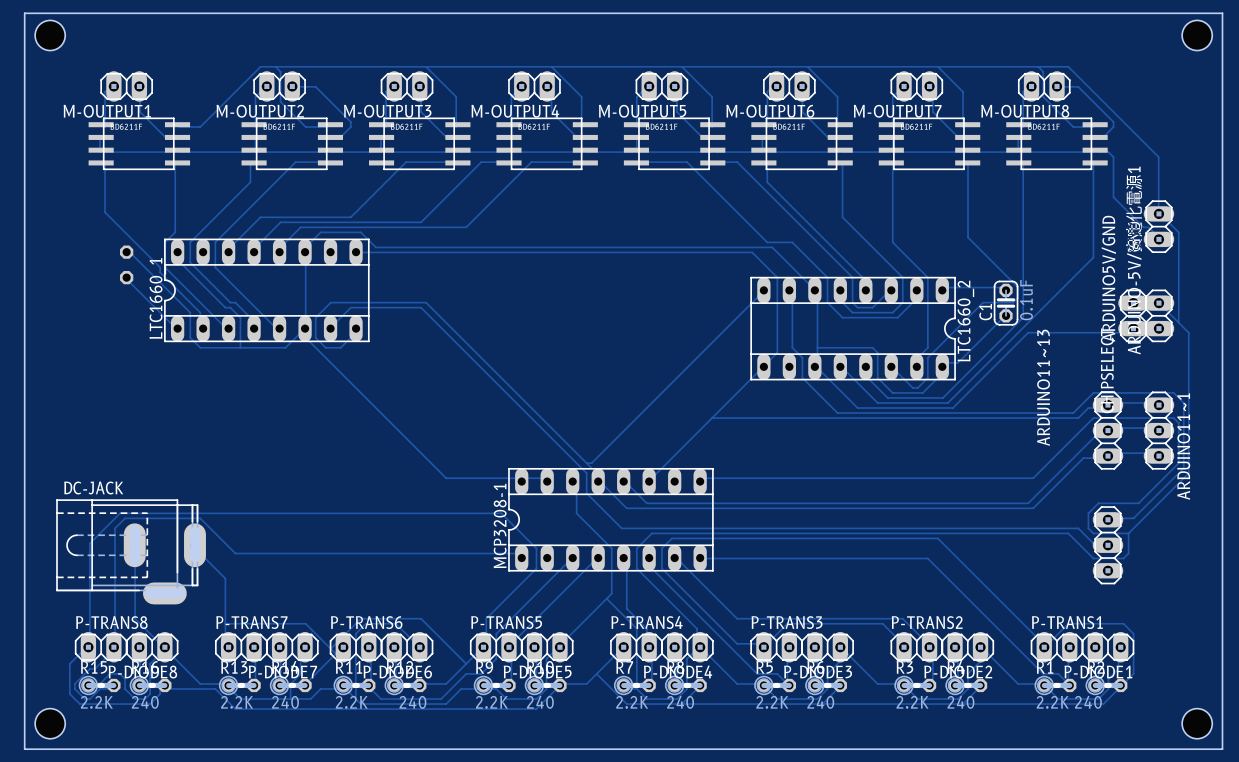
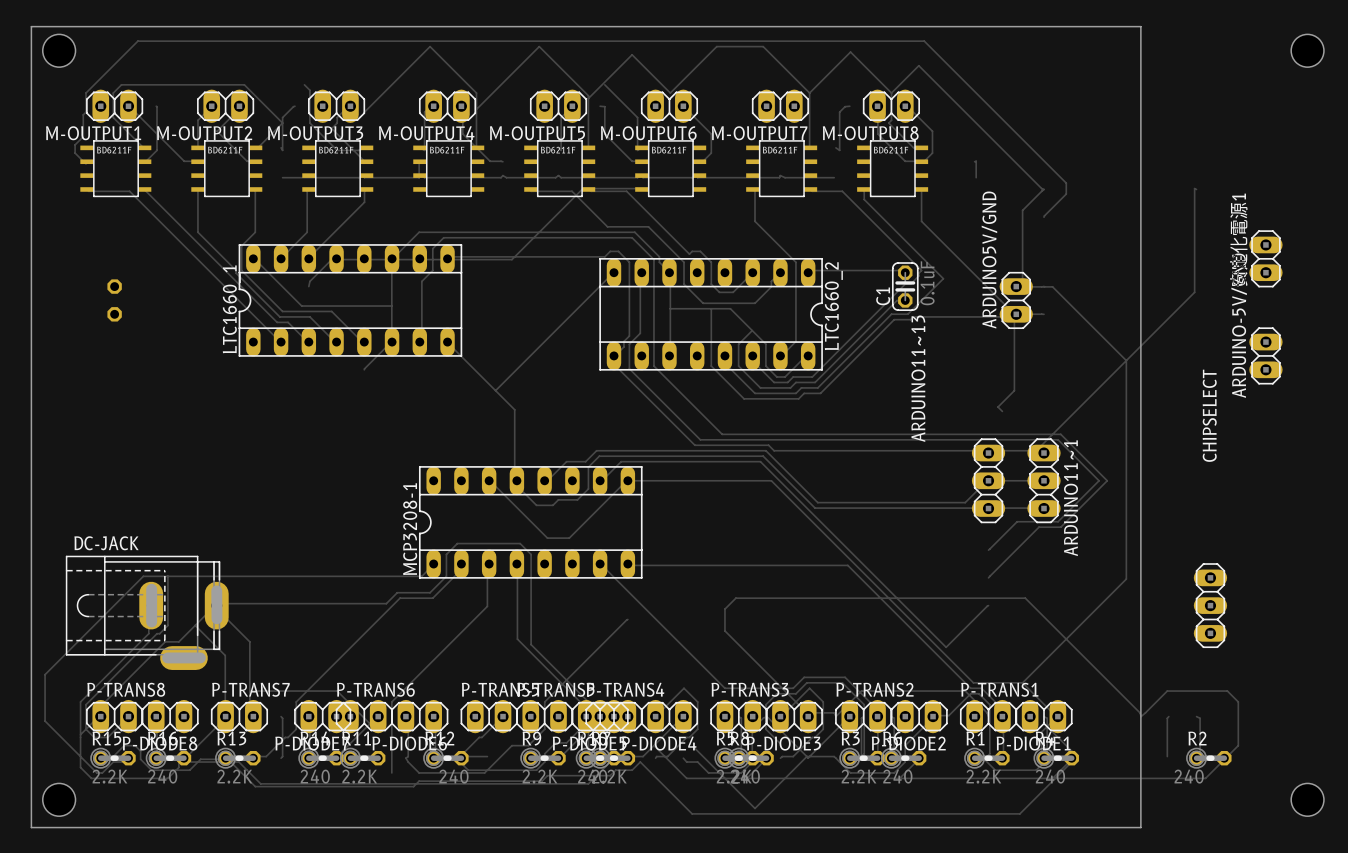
board edge: (1044, 13) (1222, 13) (1222, 749) (1044, 749) -> (1140, 26) (1140, 827)
track: none -> (468, 84) (430, 46) (364, 112)
track: (681, 66) (712, 96) (712, 127) (712, 124) -> none
track: none -> (883, 84) (850, 52) (809, 93)
track: (937, 66) (962, 91) (962, 127) (967, 124) -> none
track: (1038, 66) (1043, 71) (1043, 96) (1073, 127) (1093, 127) (1095, 124) -> none
track: (433, 74) (456, 96) (456, 127) (457, 124) -> (476, 93) (477, 147)
track: none -> (809, 93) (763, 46) (716, 46) (670, 93) (632, 54) (588, 98)
track: none -> (809, 93) (810, 147)
track: (814, 74) (837, 96) (837, 127) (840, 124) -> none
track: (113, 86) (109, 86) (104, 91) (104, 127) (101, 124) -> (128, 106) (157, 133) (157, 150) (144, 161)
M-OUTPUT1 position: (126, 86) -> (114, 106)
track: none -> (239, 106) (241, 106) (217, 131) (247, 161) (255, 161)
M-OUTPUT2 position: (279, 86) -> (225, 106)
track: (292, 86) (315, 86) (350, 121) (350, 127) (340, 137) (330, 137) -> none
M-OUTPUT3: none -> (336, 106)
track: none -> (350, 106) (337, 117) (337, 123) (331, 128) (366, 161)
M-OUTPUT4: (534, 86) -> none
track: none -> (683, 106) (711, 133) (711, 153) (703, 161) (699, 161)
track: (649, 86) (636, 96) (636, 127) (636, 124) -> none
M-OUTPUT5 position: (661, 86) -> (558, 106)
track: (674, 86) (676, 86) (676, 111) (702, 137) (712, 137) -> none
M-OUTPUT6 position: (789, 86) -> (669, 106)
track: none -> (905, 106) (932, 131) (932, 153) (921, 161)
track: (904, 86) (892, 96) (892, 127) (891, 124) -> none
M-OUTPUT7 position: (916, 86) -> (780, 106)
track: (929, 86) (932, 86) (932, 111) (957, 137) (967, 137) -> none
track: (1031, 86) (1023, 91) (1023, 127) (1018, 124) -> none
M-OUTPUT8 position: (1044, 86) -> (891, 106)
track: (1057, 86) (1078, 86) (1113, 121) (1113, 127) (1103, 137) (1095, 137) -> none
track: none -> (476, 109) (539, 46) (588, 95) (588, 147)
M-OUTPUT3 name: M-OUTPUT3 (387, 111) -> M-OUTPUT4 (426, 133)
track: none -> (144, 147) (113, 117) (113, 93) (121, 84) (244, 84) (282, 123) (255, 147)
track: (177, 124) (180, 127) (200, 127) (260, 66) (1068, 66) (1158, 157) (1158, 213) (1178, 232) (1178, 322) -> (197, 147) (197, 120) (211, 106)
track: none -> (921, 147) (913, 147) (888, 123) (891, 120) (891, 93) (918, 65) (1044, 189) (1022, 210) (1022, 278) (1016, 286) (1052, 286) (1126, 360) (1126, 579) (1022, 682)
track: (101, 137) (99, 152) (101, 150) (104, 152) (175, 152) (177, 150) (180, 152) (250, 152) (254, 150) (255, 152) (254, 137) -> none
track: (636, 137) (636, 152) -> none
track: (763, 137) (762, 137) (762, 152) (763, 150) (767, 152) (837, 152) (840, 150) (842, 152) (887, 152) (891, 150) (892, 152) (962, 152) (967, 150) (968, 152) (1018, 152) -> none
track: (1018, 137) (1018, 152) -> none
track: none -> (86, 164) (75, 153) (75, 144) (83, 136) (86, 93) (137, 41) (924, 41) (1066, 183) (1066, 194) (1044, 217)
part: none -> (115, 168)
part: (139, 143) -> none
part: none -> (226, 168)
part: (292, 143) -> none
part: none -> (337, 168)
part: none -> (448, 168)
part: (419, 143) -> none
part: none -> (559, 168)
part: (547, 143) -> none
part: none -> (670, 168)
part: (674, 143) -> none
part: none -> (781, 168)
part: (802, 143) -> none
part: none -> (892, 168)
part: (929, 143) -> none
part: (1056, 143) -> none
track: (1018, 152) (1018, 150) (1023, 152) (1093, 152) (1095, 150) (1108, 152) (1113, 157) (1113, 197) (1143, 227) (1148, 227) (1158, 239) -> none
track: none -> (86, 189) (88, 191) (129, 191) (281, 342)
track: (101, 162) (104, 162) (104, 212) (160, 267) (160, 272) (200, 312) (200, 327) (203, 328) -> none
track: none -> (144, 189) (277, 322) (288, 322) (308, 342)
track: (177, 162) (175, 162) (175, 232) (165, 242) (165, 267) (225, 327) (228, 328) -> (197, 189) (197, 232) (279, 316) (309, 316) (336, 342)
track: (254, 162) (250, 162) (250, 182) (230, 202) -> (255, 189) (255, 232)
track: none -> (308, 189) (307, 191) (307, 232) (281, 258)
track: (330, 162) (295, 162) (215, 242) (215, 267) (275, 327) (279, 328) -> none
track: none -> (366, 189) (364, 191) (364, 202) (308, 258)
track: (457, 162) (406, 162) (350, 217) (260, 217) (230, 247) (228, 252) -> none
track: none -> (530, 189) (531, 191) (572, 191) (607, 226) (648, 226) (684, 262) (684, 284) (703, 303) (755, 303) (771, 286) (771, 281) (780, 272)
track: (508, 162) (481, 162) (421, 222) (280, 222) (255, 247) (254, 252) -> none
track: none -> (588, 189) (591, 191) (626, 191) (689, 254) (692, 251) (700, 251) (711, 262) (711, 284) (719, 292) (733, 292) (752, 272)
track: (636, 162) (687, 162) (767, 242) (792, 242) (827, 277) (827, 302) (842, 317) (897, 317) (912, 302) (912, 292) (916, 290) -> none
track: none -> (752, 189) (755, 191) (755, 221) (795, 262) (795, 341) (780, 355)
track: (712, 162) (737, 162) (852, 277) (852, 302) (857, 307) (872, 307) (891, 290) -> none
track: none -> (810, 189) (812, 191) (842, 191) (921, 270) (910, 284) (905, 284) (812, 377) (793, 377) (787, 382) (774, 382) (752, 360) (755, 357) (752, 355)
track: (763, 162) (767, 162) (767, 182) (862, 277) (862, 287) (865, 290) -> none
track: none -> (863, 189) (864, 199) (943, 278) (907, 314) (891, 314) (817, 387) (801, 387) (795, 393) (755, 393) (722, 360) (724, 355)
track: (891, 162) (892, 162) (892, 242) -> (921, 221) (976, 275)
track: (967, 162) (968, 237) (1018, 287) (1018, 297) (1013, 302) (983, 302) (927, 357) (927, 377) (917, 387) -> (988, 577) (1038, 527) (1060, 527) (1107, 480) (1060, 434) (1003, 434)
track: (1018, 162) (1023, 162) (1023, 317) (942, 397) (887, 397) (867, 377) (867, 367) (865, 366) -> none
track: (842, 192) (842, 217) (902, 277) (902, 302) (892, 312) (852, 312) (842, 302) (842, 292) (840, 290) -> none
track: (217, 214) (190, 242) (190, 262) (230, 302) (235, 302) (250, 317) (250, 327) (254, 328) -> (241, 245) (241, 270) (282, 311) (331, 311) (364, 342)
track: none -> (253, 258) (301, 306) (391, 306)
track: none -> (613, 272) (495, 390)
track: none -> (808, 272) (809, 270) (905, 270) (905, 272)
track: (126, 252) (130, 252) (190, 312) (190, 337) (200, 347) (285, 347) (300, 332) -> none
track: (177, 252) (180, 252) (180, 262) (225, 307) (230, 307) (240, 317) (240, 347) -> none
track: (356, 252) (752, 252) (777, 277) (777, 352) (649, 481) -> none
part position: (126, 264) -> (114, 300)
track: none -> (905, 300) (896, 300) (815, 382) (795, 382) (790, 387) (760, 387) (738, 366) (738, 344) (752, 330)
track: none -> (670, 308) (730, 308) (765, 344) (765, 366) (776, 377) (785, 377) (808, 355)
track: none -> (711, 308) (711, 366) (744, 398) (798, 398) (804, 393) (820, 393) (894, 319) (910, 319) (913, 316) (1014, 316) (1017, 314) (1044, 314)
track: (126, 277) (177, 328) -> none
LTC1660_1 position: (266, 290) -> (350, 300)
track: (763, 290) (591, 463) (586, 463) -> none
track: (789, 290) (792, 292) (792, 347) (802, 357) (802, 377) (837, 413) (1073, 413) (1093, 392) (1173, 392) (1183, 402) (1183, 468) (1133, 518) (1107, 519) -> none
track: (942, 290) (942, 287) (1003, 287) (1006, 290) -> none
track: none -> (447, 342) (514, 409) (514, 480) (517, 480) (514, 483) (536, 505) (552, 505) (558, 499) (577, 499) (588, 488) (588, 467) (599, 456) (763, 456) (815, 508) (1044, 508)
C1 position: (1006, 303) -> (905, 286)
track: (1133, 303) (1158, 302) (1188, 332) (1188, 473) (1128, 533) -> none
track: (350, 307) (421, 307) (586, 473) (586, 493) (621, 528) (1078, 528) (1093, 543) (1107, 545) -> (386, 346) (391, 341) (391, 259) (419, 232) (634, 232) (659, 256) (659, 262) (670, 273) (669, 355)
track: (1006, 315) (957, 362) (942, 362) (942, 366) (937, 367) (937, 377) (922, 392) -> (988, 550) (1017, 521) (1058, 521) (1099, 480) (1058, 439) (1008, 439)
ARDUINO5V/GND position: (1133, 315) -> (1016, 300)
track: (356, 328) (355, 332) (340, 347) (325, 347) (315, 337) (315, 317) (330, 302) (426, 302) (601, 478) (598, 481) (626, 508) -> (627, 564) (686, 565)
LTC1660_2 position: (853, 328) -> (711, 314)
track: (1158, 328) (1133, 327) (1128, 332) (1028, 332) (952, 407) (857, 407) (814, 366) (817, 362) (817, 292) (772, 247) (375, 247) (360, 232) (320, 232) (305, 247) (305, 327) (300, 332) -> none
track: (300, 332) (446, 478) (521, 478) (521, 481) (526, 478) (546, 478) (547, 481) -> none
track: (817, 347) (872, 347) (877, 352) (877, 377) (892, 392) -> (641, 272) (640, 333) (629, 344) (629, 368) (700, 439) (976, 439)
track: (840, 366) (877, 402) -> (447, 258) (449, 256) (604, 256) (610, 251) (618, 251) (629, 262) (629, 336) (623, 341) (623, 346) (610, 360) (694, 445) (768, 445) (774, 450) (959, 450)
track: (891, 366) (912, 387) -> (419, 342) (421, 341) (421, 281) (432, 270) (432, 248) (443, 237) (632, 237) (653, 259) (653, 366) (722, 434) (998, 434)
ARDUINO11~13 name position: ARDUINO11~13 (1043, 387) -> ARDUINO11~13 (918, 378)
track: (1158, 405) (1158, 402) (1108, 402) (1103, 407) (1088, 407) (1078, 418) (712, 418) -> none
track: none -> (489, 480) (547, 538) (569, 538) (626, 480) (771, 480) (973, 682) (1022, 682)
track: none -> (544, 480) (547, 480) (566, 461) (585, 461) (596, 450) (765, 450) (817, 502) (965, 502) (987, 480) (1044, 480)
track: none -> (600, 480) (621, 461) (760, 461) (946, 647) (988, 605)
ARDUINO11~13 position: (1107, 430) -> (988, 480)
track: (1158, 430) (1158, 428) (1108, 428) (1107, 430) (1103, 428) (1028, 503) (646, 503) (623, 481) -> none
ARDUINO11~1 position: (1158, 430) -> (1044, 480)
track: (1158, 456) (1158, 453) (1108, 453) (1107, 456) (1103, 458) (1083, 458) (1033, 508) (774, 508) -> (1002, 758) (1002, 716) (1006, 712) (981, 688) (970, 688) (847, 565)
track: (572, 481) (576, 483) (576, 513) (611, 548) (611, 593) (546, 658) (546, 688) (536, 699) (506, 699) (496, 688) (486, 688) (483, 685) (481, 688) (461, 688) (446, 704) (360, 704) (343, 685) (340, 688) (320, 688) (310, 699) (240, 699) (225, 683) (200, 683) (165, 648) -> none
track: (700, 481) (702, 478) (1033, 478) (1093, 418) (1173, 418) (1178, 423) (1178, 463) (1138, 503) (1098, 503) (1088, 513) (1088, 528) (1093, 533) (1128, 533) -> none
track: none -> (461, 564) (460, 570) (432, 598) (400, 598) (296, 701) (296, 729) (266, 756) (253, 758)
track: none -> (516, 564) (517, 639) (585, 707) (585, 723) (566, 742) (555, 742) (544, 753) (544, 762) (536, 770) (468, 770) (457, 759) (503, 716)
track: none -> (600, 564) (724, 688) (793, 688) (804, 677) (845, 677) (880, 712) (877, 716) (877, 758)
track: (127, 518) (125, 518) (115, 528) (115, 648) (94, 668) (89, 668) (74, 683) (74, 688) -> (143, 576) (45, 674) (45, 721) (86, 762)
track: none -> (167, 576) (167, 625) (159, 633) (157, 633) (86, 704) (86, 729) (94, 737) (107, 737) (128, 716)
track: (200, 518) (235, 553) (521, 553) (521, 558) -> (222, 576) (421, 576) (433, 564)
MCP3208‐1 position: (610, 519) -> (530, 522)
track: (1128, 533) (1128, 553) (1123, 558) (1093, 558) (1068, 533) (651, 533) (636, 548) (636, 568) (697, 628) (697, 643) (700, 647) -> none
track: (134, 545) (135, 618) (165, 648) -> (151, 605) (148, 606) (148, 633) (80, 701) (80, 734)
track: (598, 558) (508, 647) (511, 648) (511, 683) -> none
track: (623, 558) (626, 558) (626, 608) (646, 628) (646, 643) (651, 648) (651, 683) (649, 685) -> none
track: (649, 558) (651, 558) (651, 568) (757, 673) (777, 673) (787, 683) -> none
track: (674, 558) (737, 618) (902, 618) (932, 648) (932, 683) (929, 685) -> none
track: (700, 558) (927, 558) (1043, 673) (1058, 673) (1069, 685) -> none
track: none -> (195, 625) (225, 655) (225, 716) (183, 758)
track: (606, 598) (636, 628) (636, 633) -> (655, 716) (684, 688) (697, 701)
track: (365, 623) (395, 623) (419, 647) -> (402, 691) (487, 606) (487, 565) (489, 564)
track: (89, 636) (89, 543) (120, 513) (501, 513) (536, 548) (536, 568) (486, 618) (486, 643) (446, 683) (443, 683) -> (102, 704) (165, 641) (178, 641) (217, 603) (386, 603) (397, 592) (430, 592) (446, 576) (446, 554) (457, 543) (520, 543) (531, 554) (531, 644) (602, 715) (561, 756)
P-TRANS7 position: (241, 647) -> (239, 716)
track: (305, 647) (300, 648) (300, 673) (290, 683) (290, 699) -> none
P-TRANS6 position: (356, 647) -> (364, 716)
P-DIODE6 position: (407, 647) -> (419, 716)
P-TRANS5: none -> (489, 716)
P-TRANS4 position: (636, 647) -> (613, 716)
P-DIODE4 position: (687, 647) -> (669, 716)
track: none -> (780, 716) (809, 688) (823, 701) (823, 729) (793, 756) (780, 758)
track: none -> (849, 716) (755, 808) (694, 748)
P-TRANS3 position: (776, 647) -> (738, 716)
P-DIODE3 position: (827, 647) -> (794, 716)
P-TRANS2 position: (916, 647) -> (863, 716)
P-DIODE2 position: (967, 647) -> (919, 716)
P-TRANS1 position: (1057, 647) -> (988, 716)
P-DIODE1 position: (1107, 647) -> (1044, 716)
track: (1120, 647) (1118, 648) (1118, 668) (1108, 678) (1108, 688) (1098, 699) (1058, 699) (1043, 683) (1018, 683) (983, 648) (980, 647) (988, 653) (968, 673) (968, 688) (957, 699) (917, 699) (902, 683) (877, 683) (840, 647) (847, 653) -> (1022, 682) (1057, 716) (1041, 731) (1041, 764) (1036, 770) (995, 770) (984, 759) (989, 753) (989, 704) (978, 693) (970, 693) (948, 715) (935, 715) (927, 723)
track: (165, 648) (150, 663) (150, 694) (145, 699) (135, 699) (125, 688) (125, 686) -> (1047, 726) (1071, 751) (1071, 762) (1019, 813) (692, 813) (640, 762) (632, 770) (615, 770) (610, 775) (547, 775) (542, 781) (419, 781) (413, 786) (255, 786) (225, 758) (200, 759) (189, 770) (151, 770) (140, 759)
track: (330, 648) (360, 618) (421, 618) (466, 663) -> none
track: (636, 658) (636, 688) -> (697, 729) (667, 756) (655, 758)
track: none -> (779, 742) (765, 729) (765, 704) (776, 693) (795, 693) (806, 682) (842, 682) (864, 704) (864, 753) (858, 759) (849, 758)
R13 position: (239, 685) -> (237, 758)
R11 position: (354, 685) -> (362, 758)
R7 position: (634, 685) -> (612, 758)
R5 position: (775, 685) -> (737, 758)
R3 position: (915, 685) -> (862, 758)
R1 position: (1055, 685) -> (986, 758)

